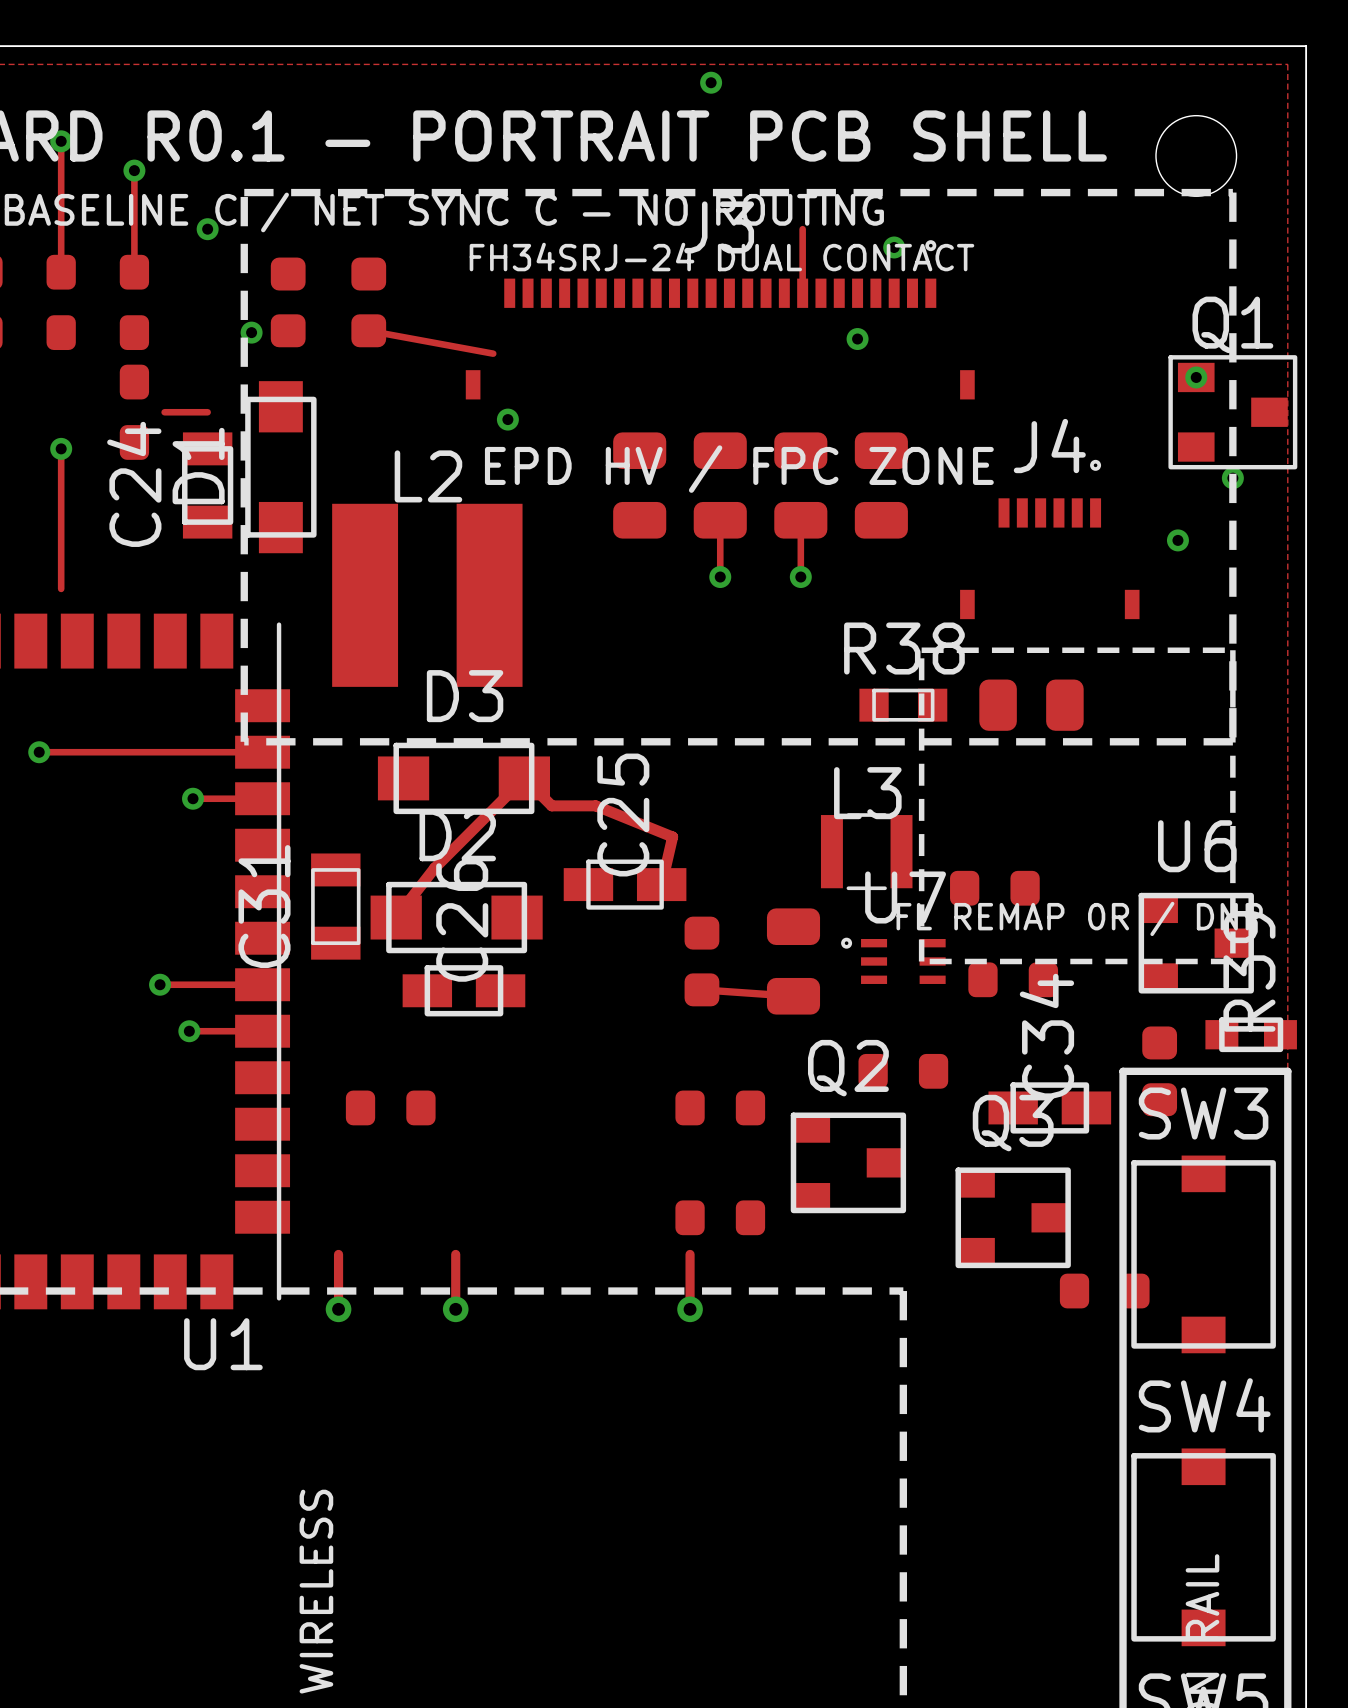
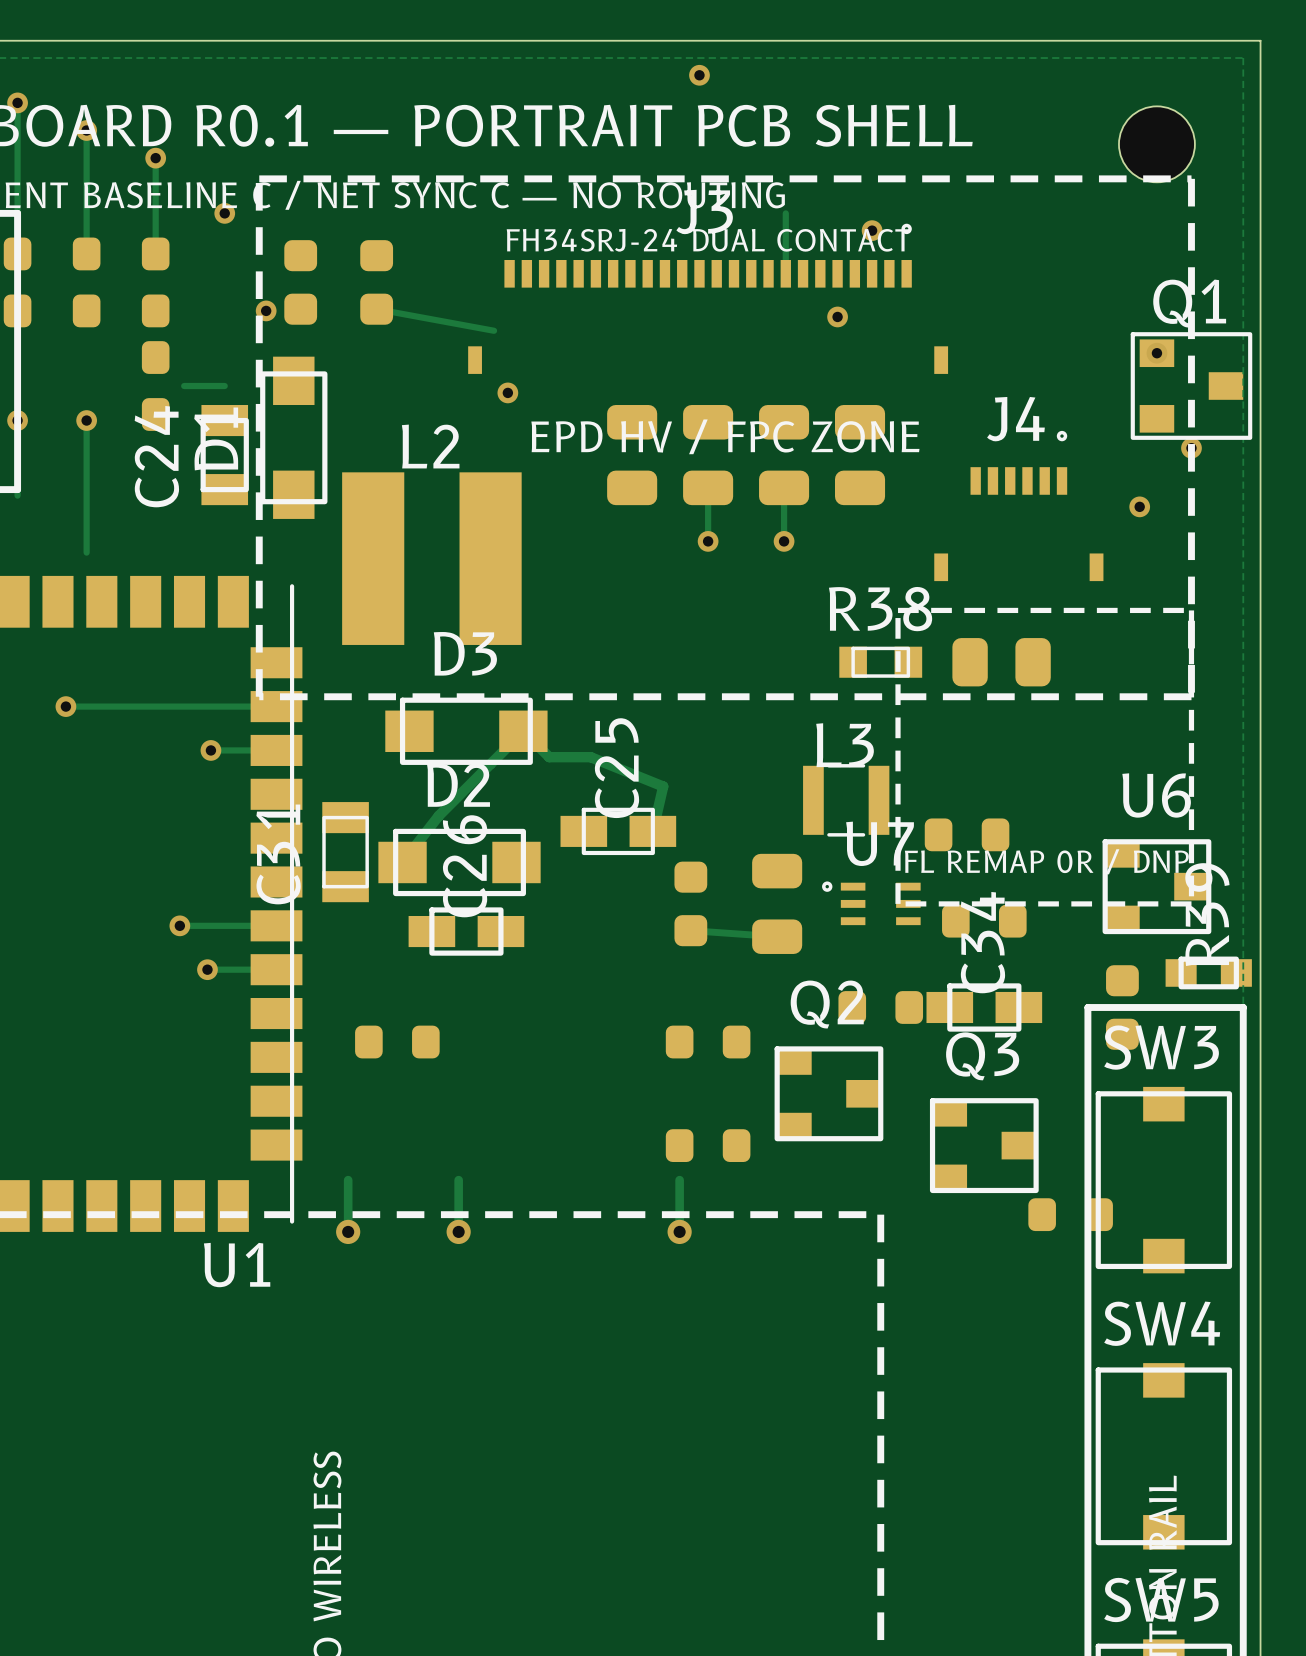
C34 position: (1049, 1107) -> (984, 1007)

